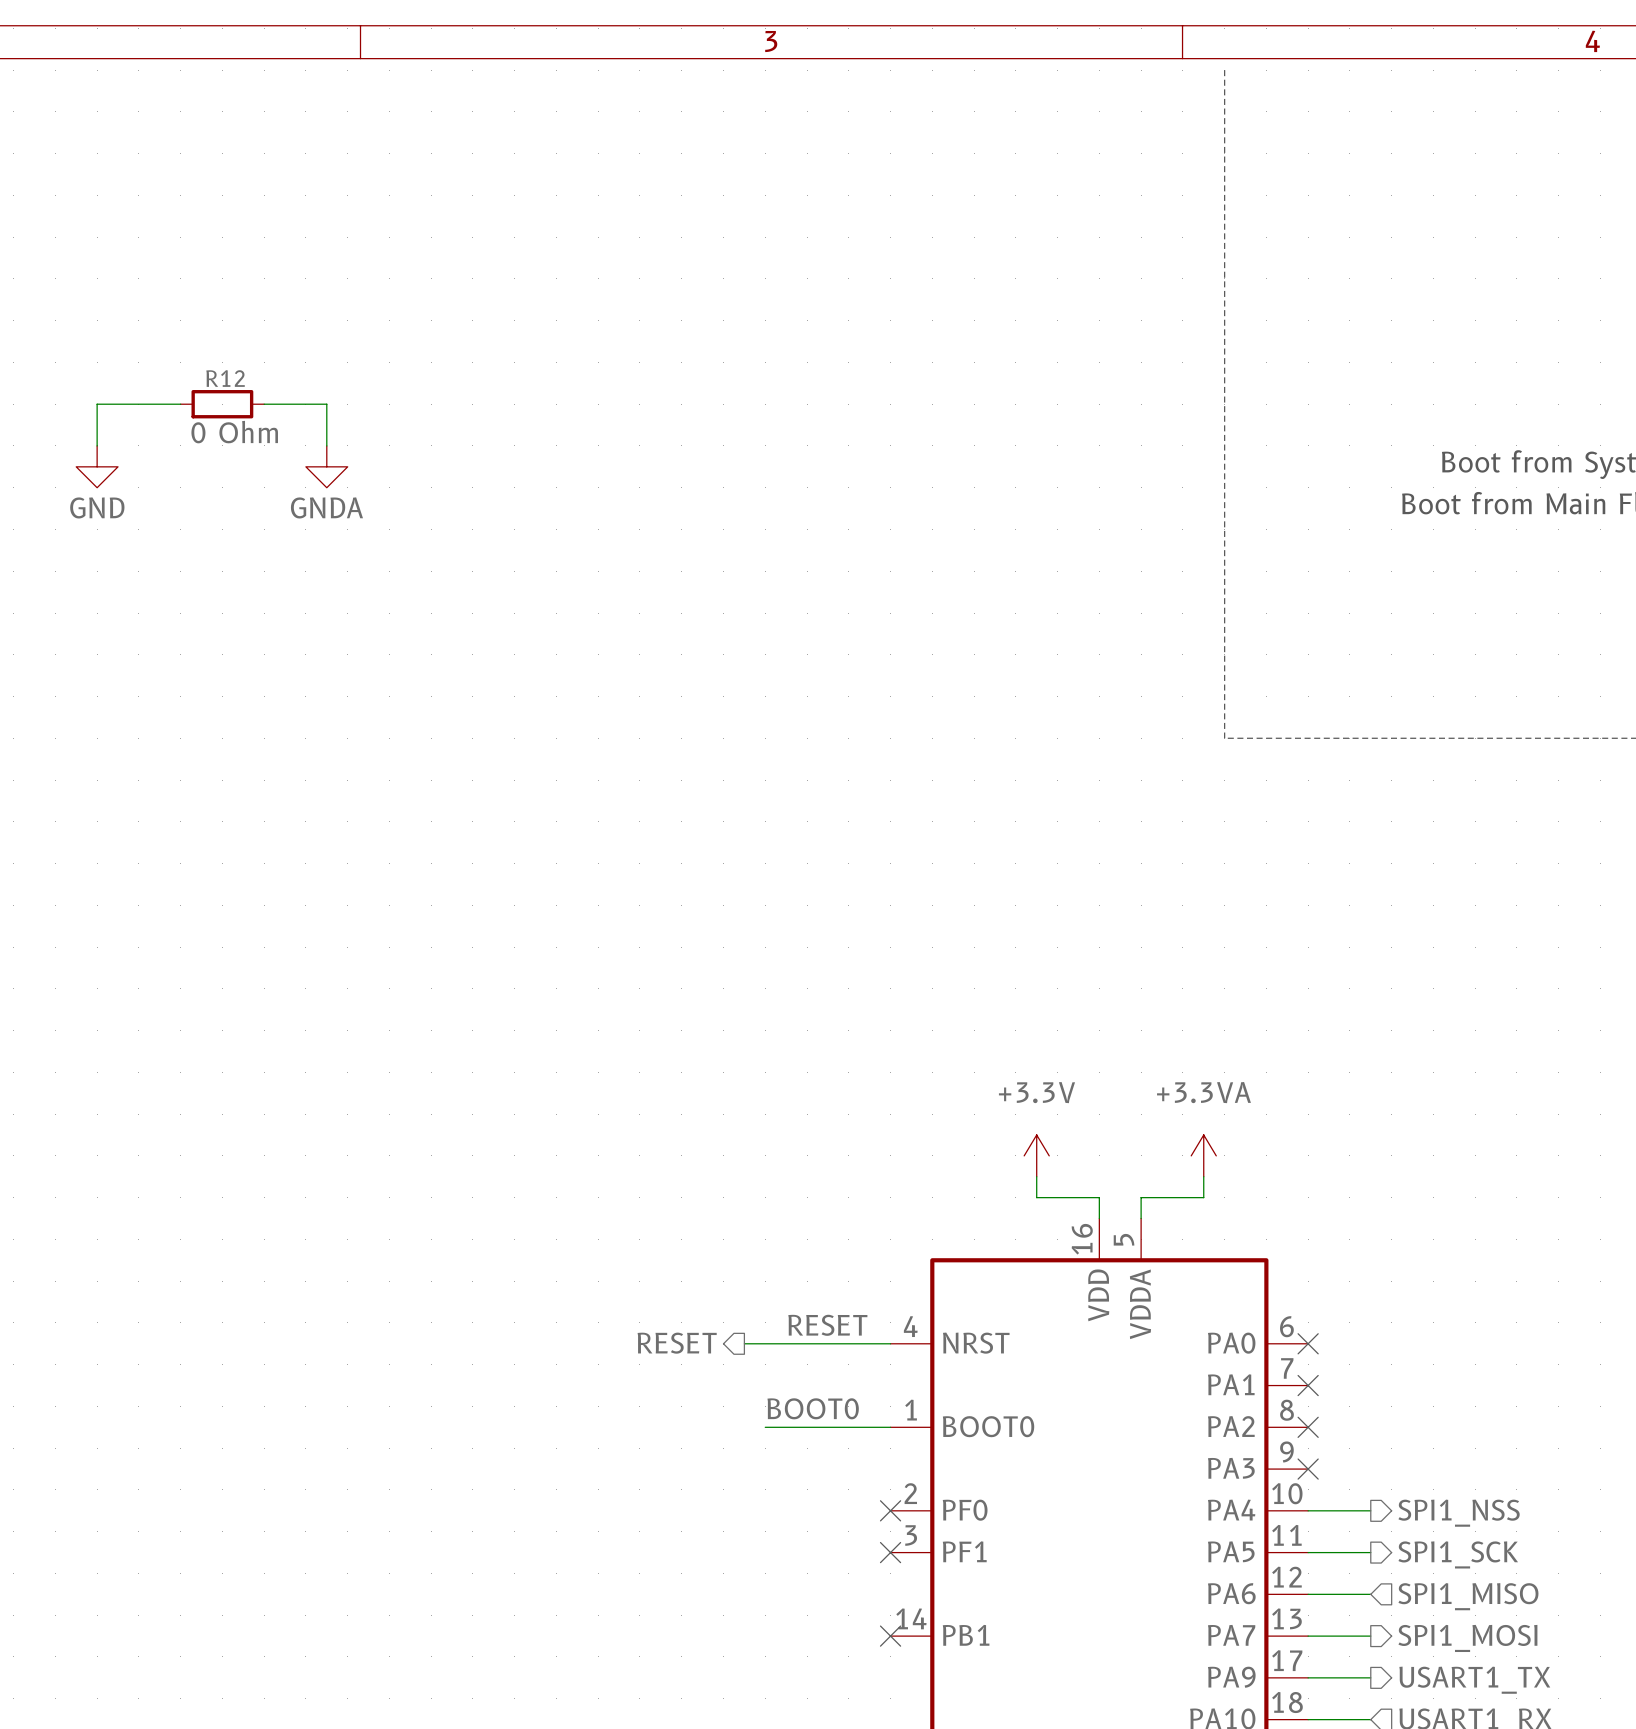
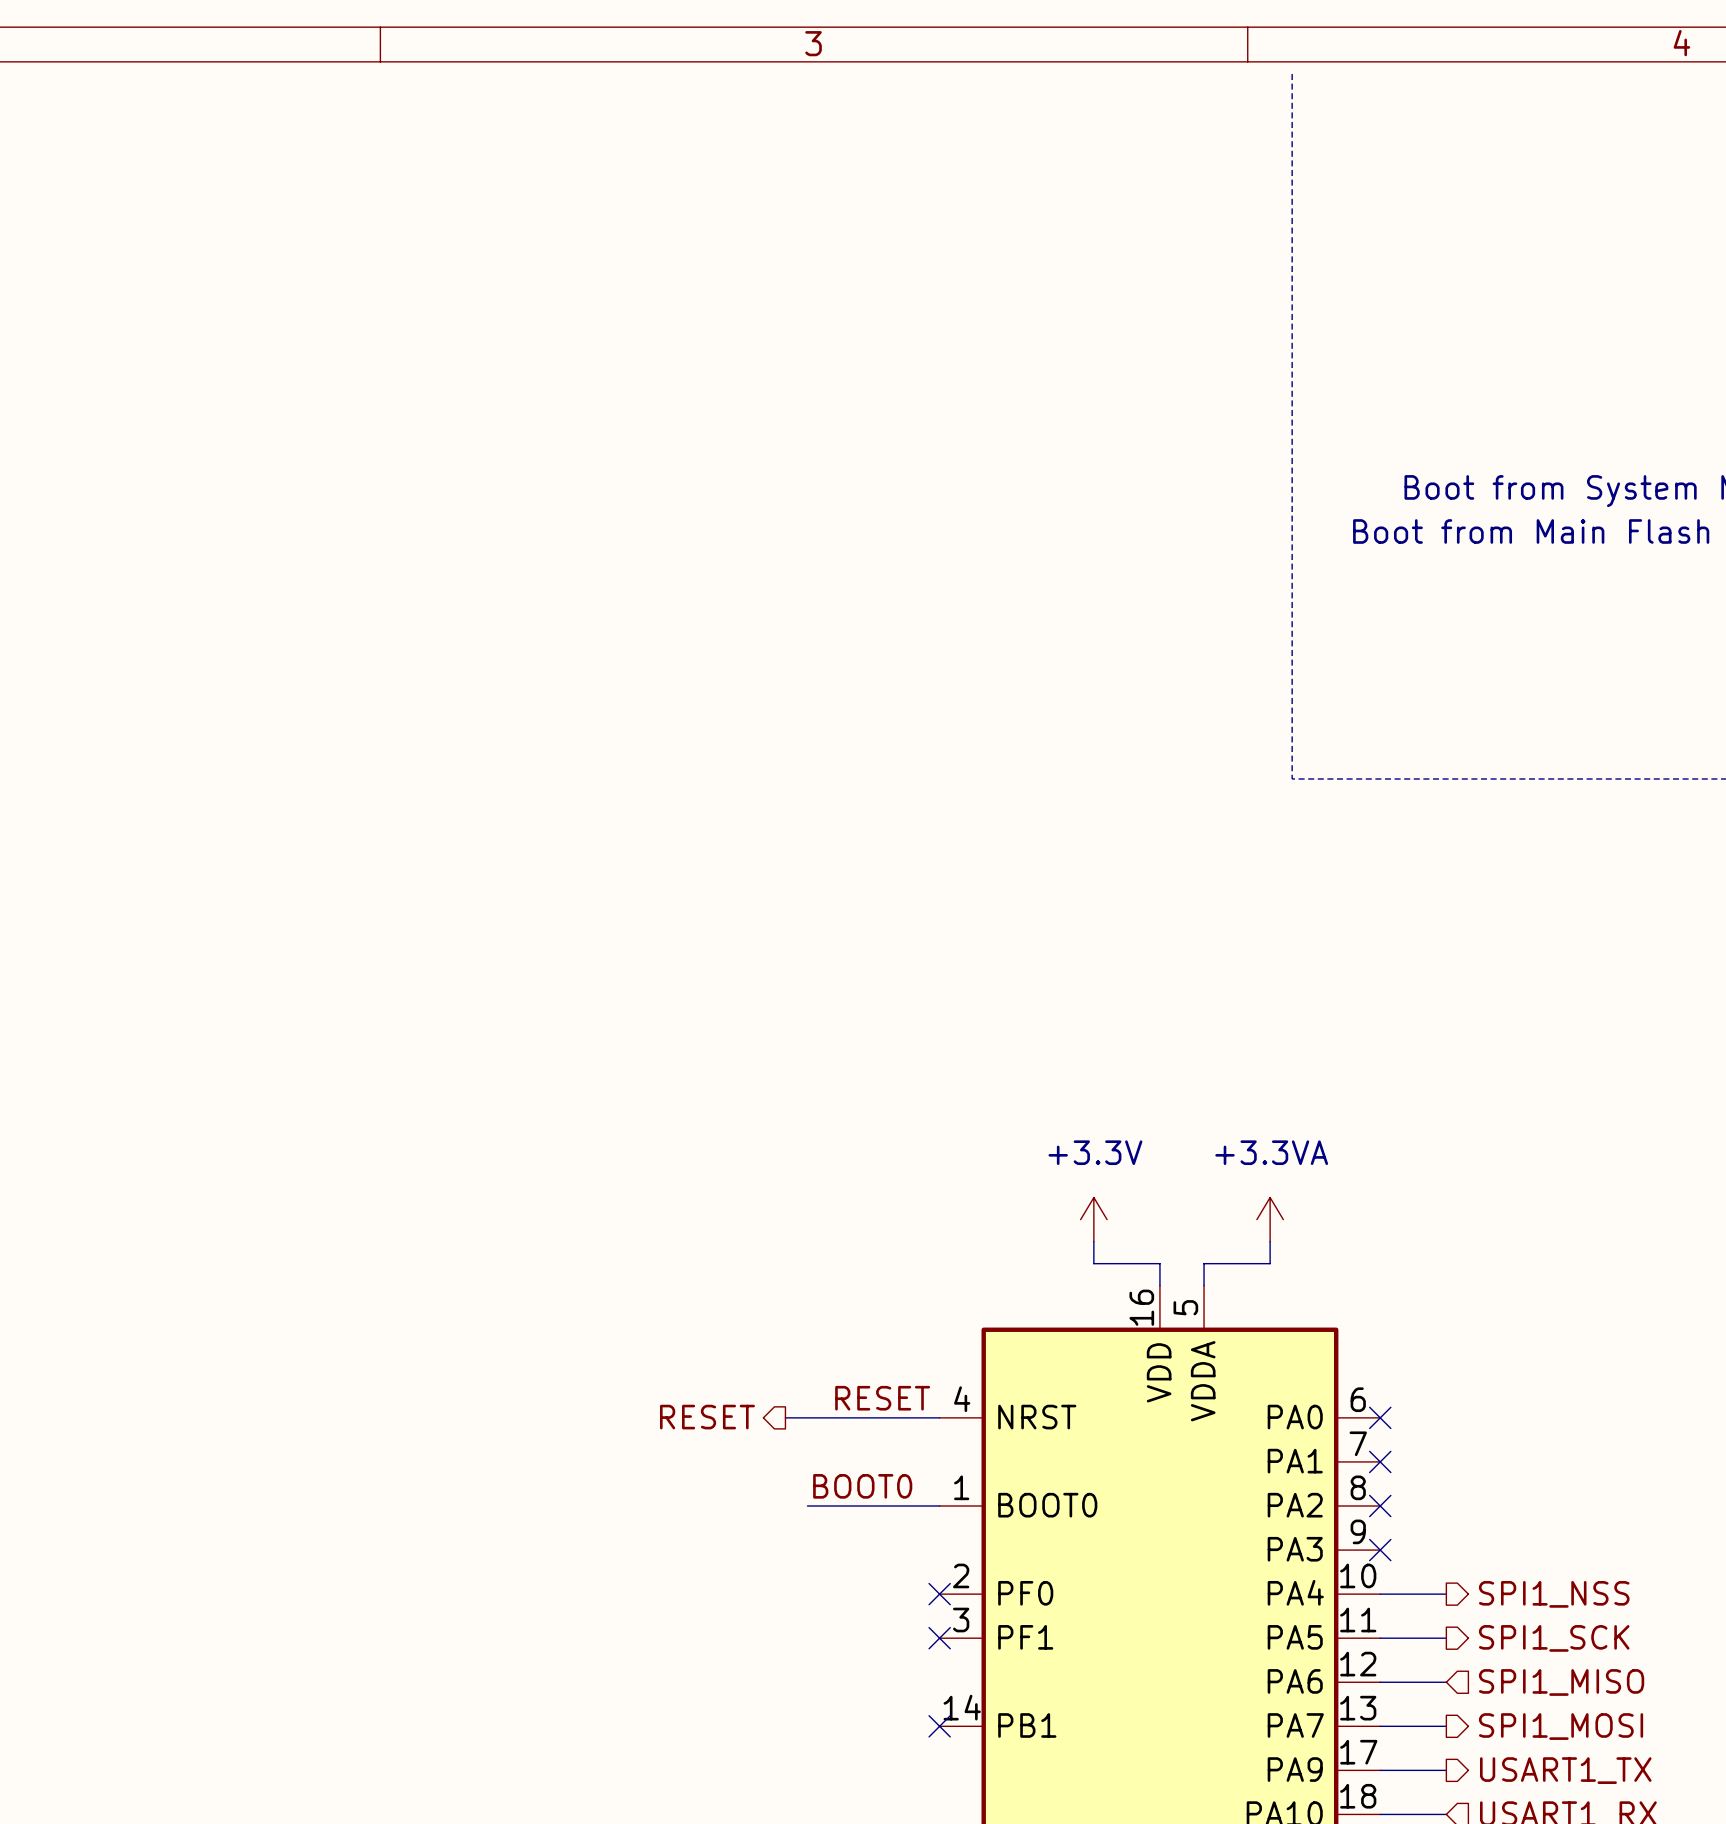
wire: (180, 404) (97, 404) (97, 445) -> none
R12: 0 Ohm (222, 404) -> none
wire: (264, 404) (326, 404) (326, 445) -> none
power symbol: GND (97, 466) -> none
power symbol: GNDA (326, 466) -> none

